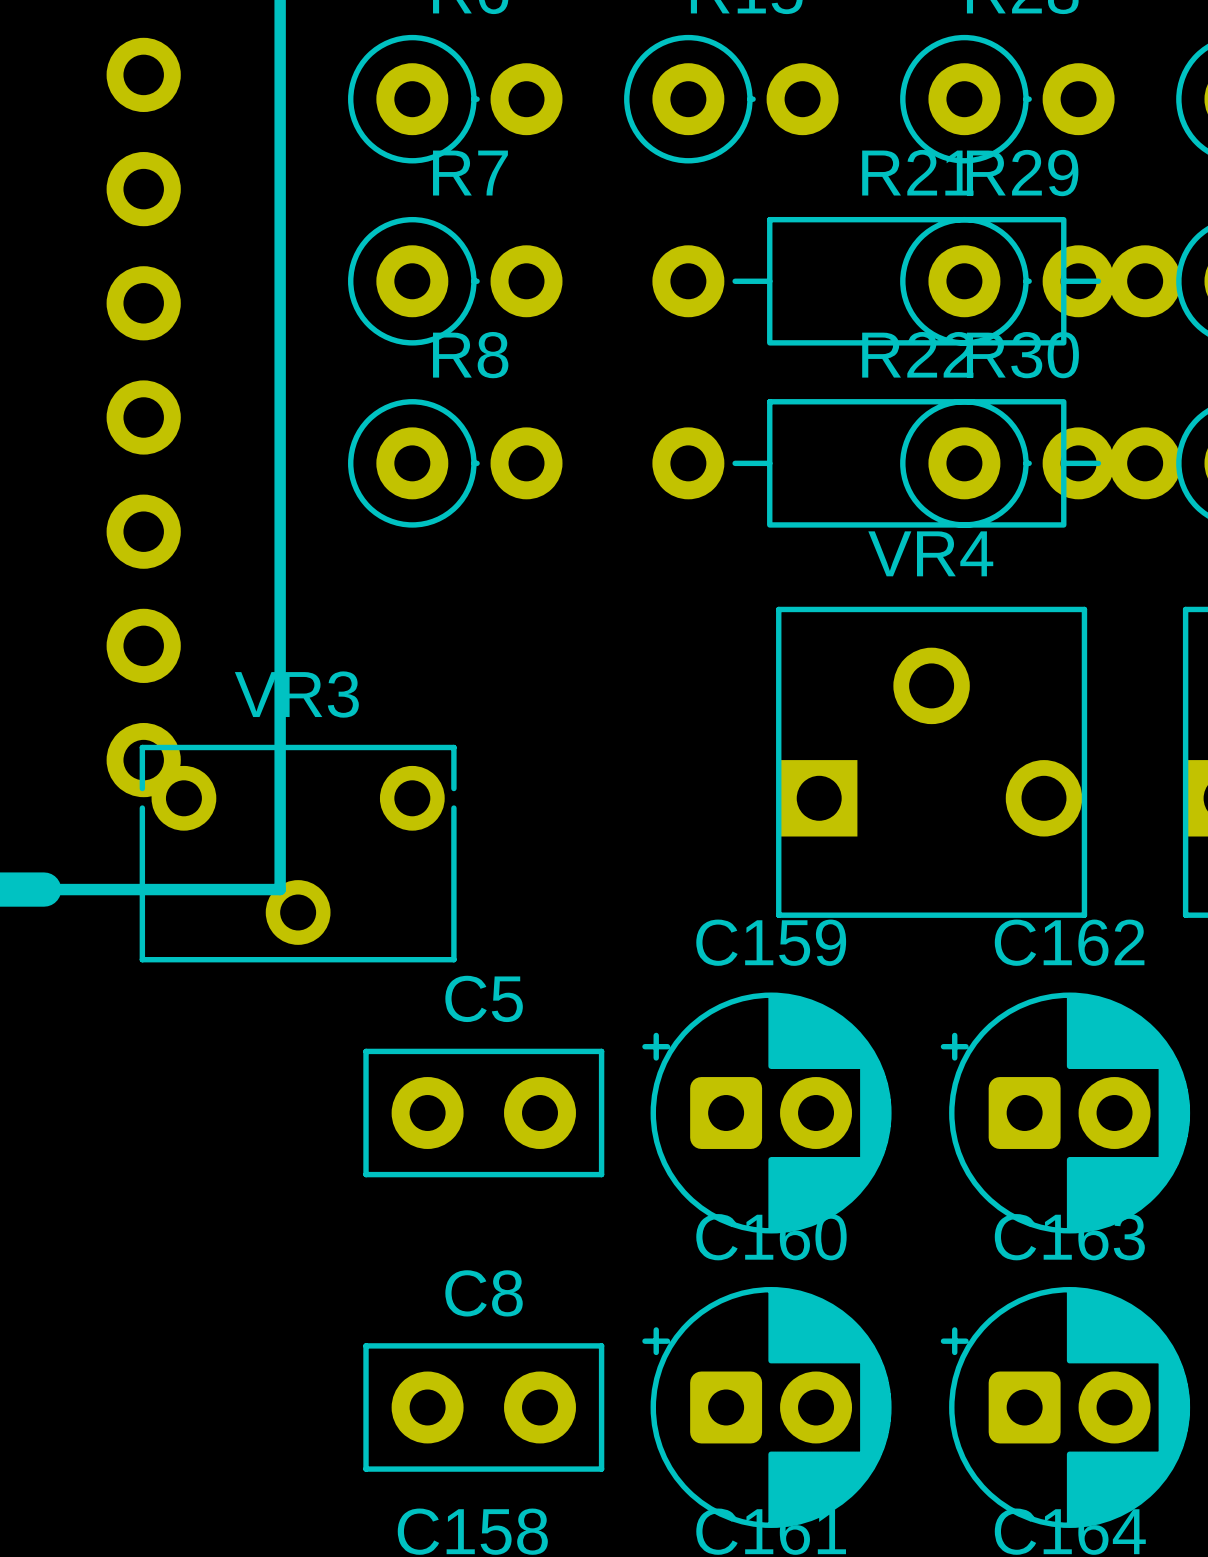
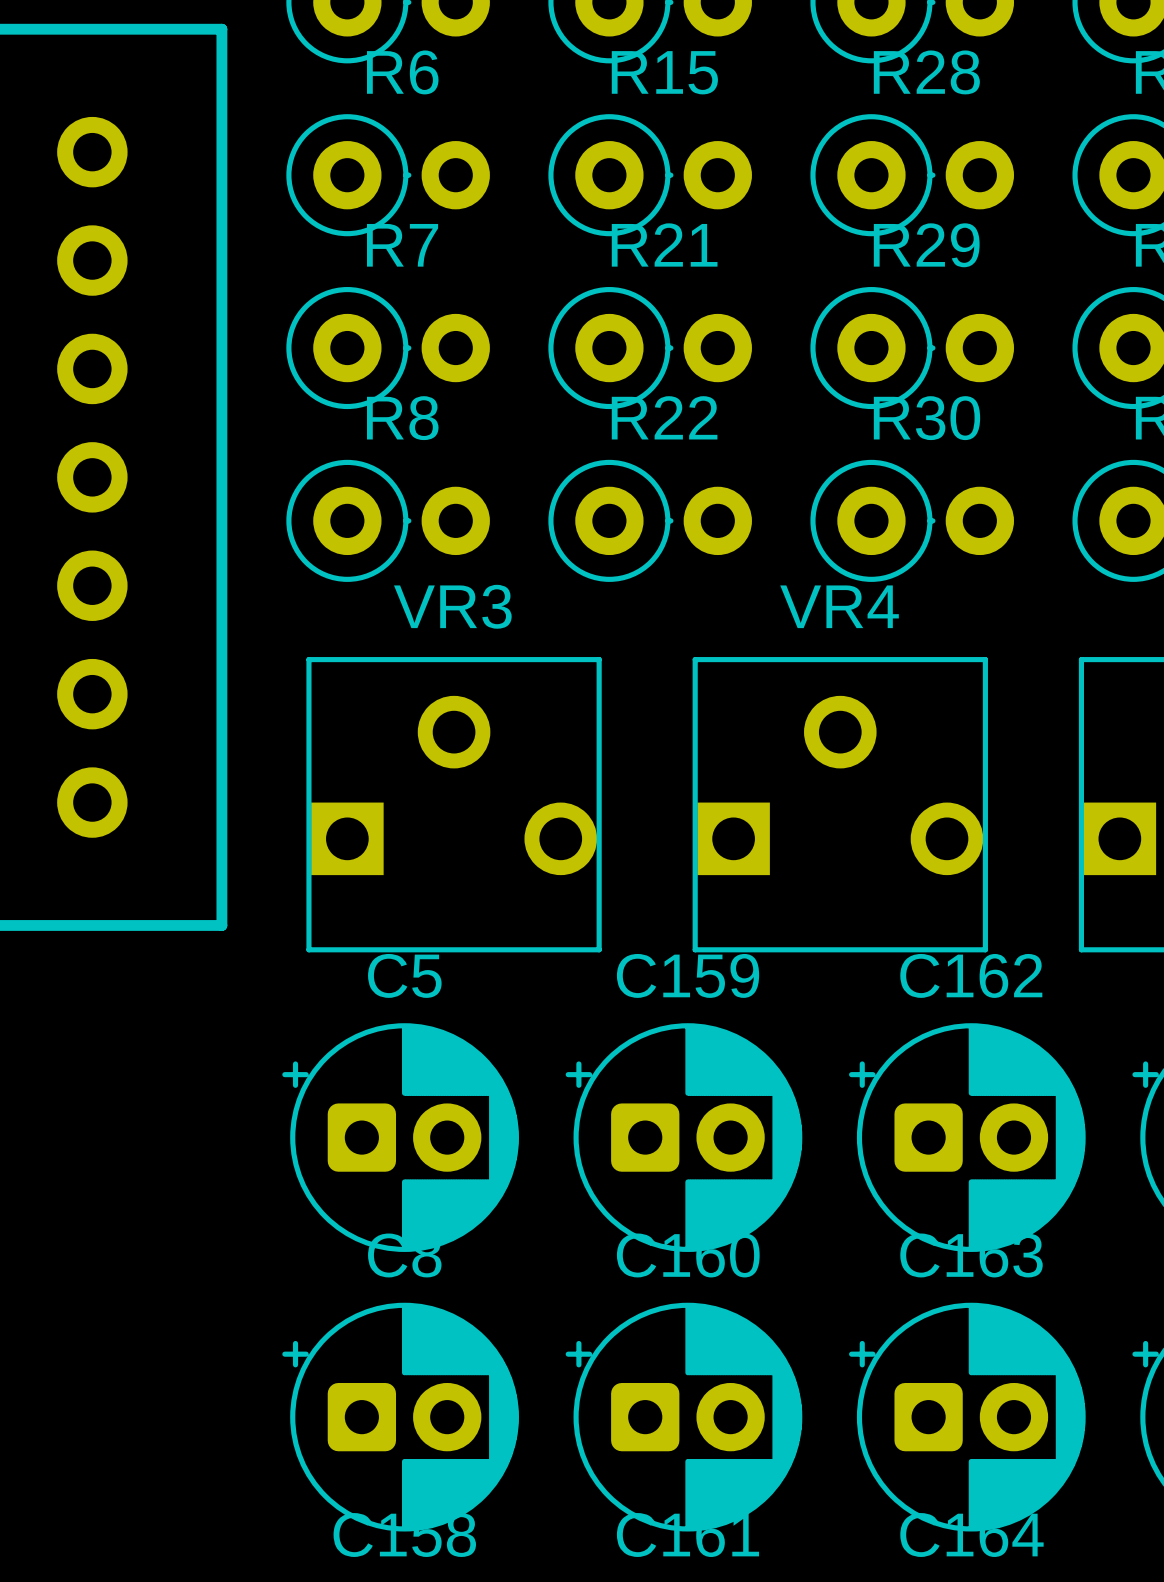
R21 footprint: [652, 216, 1182, 346] -> [548, 287, 752, 410]
R22 footprint: [652, 399, 1182, 528] -> [548, 459, 752, 582]
VR3 footprint: [139, 744, 457, 963] -> [306, 657, 602, 953]
C5 footprint: [363, 1048, 605, 1178] -> [282, 1023, 519, 1252]
C8 footprint: [363, 1343, 605, 1472] -> [282, 1302, 519, 1532]

